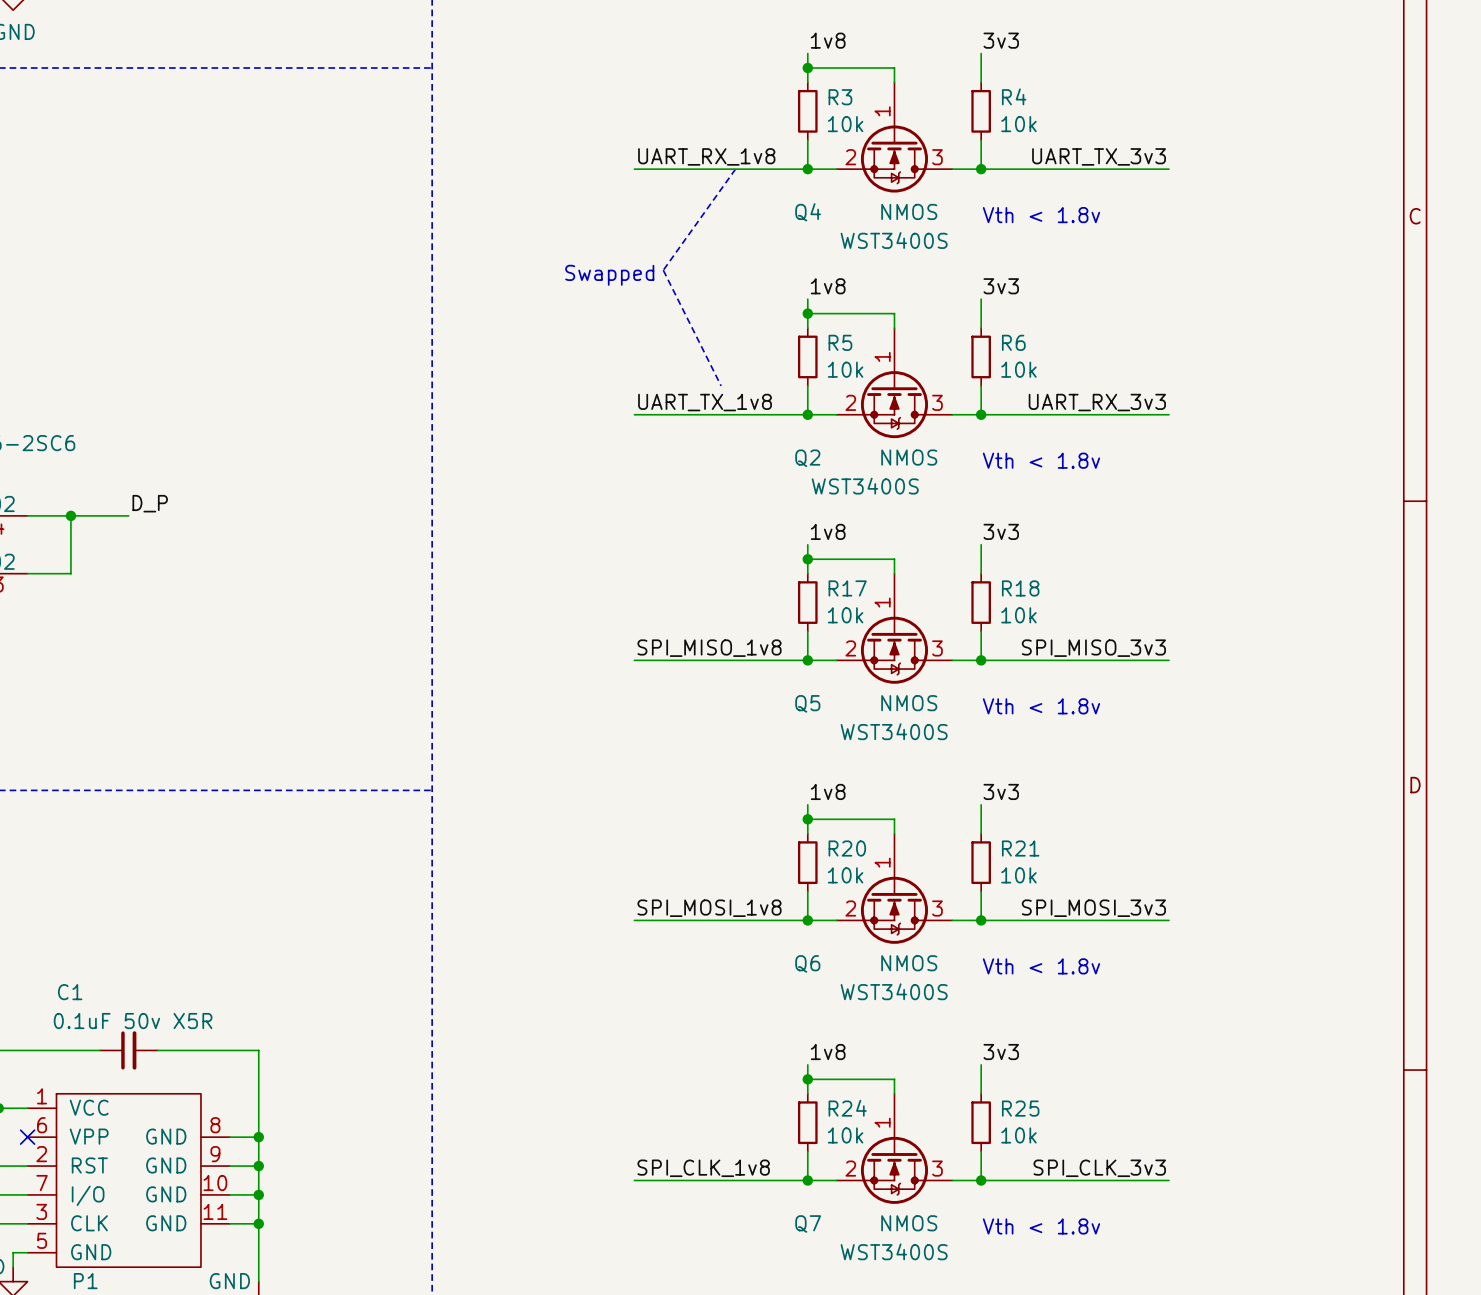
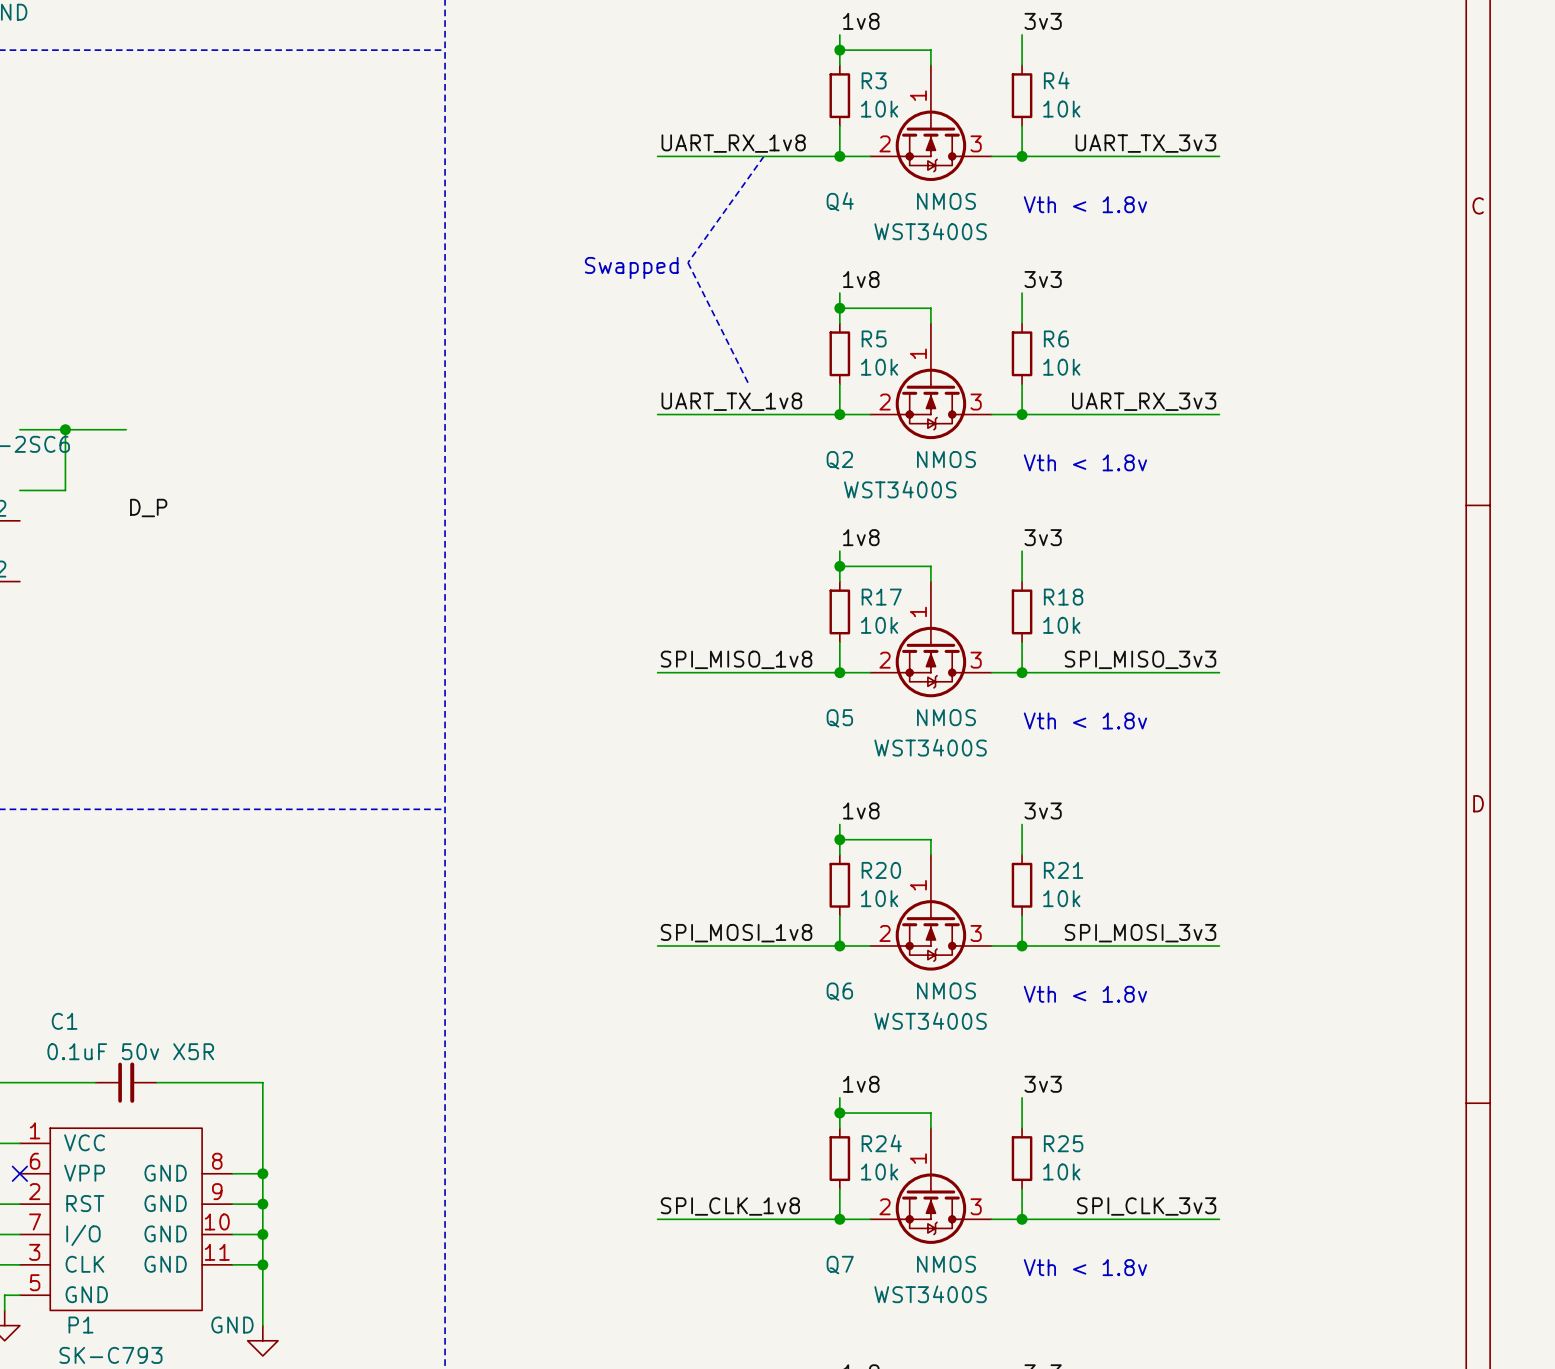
junction: none -> (65, 429)
wire: (27, 515) (128, 515) -> (19, 429) (126, 429)
wire: (70, 515) (70, 573) (27, 573) -> (65, 429) (65, 490) (19, 490)
junction: (70, 515) -> none

